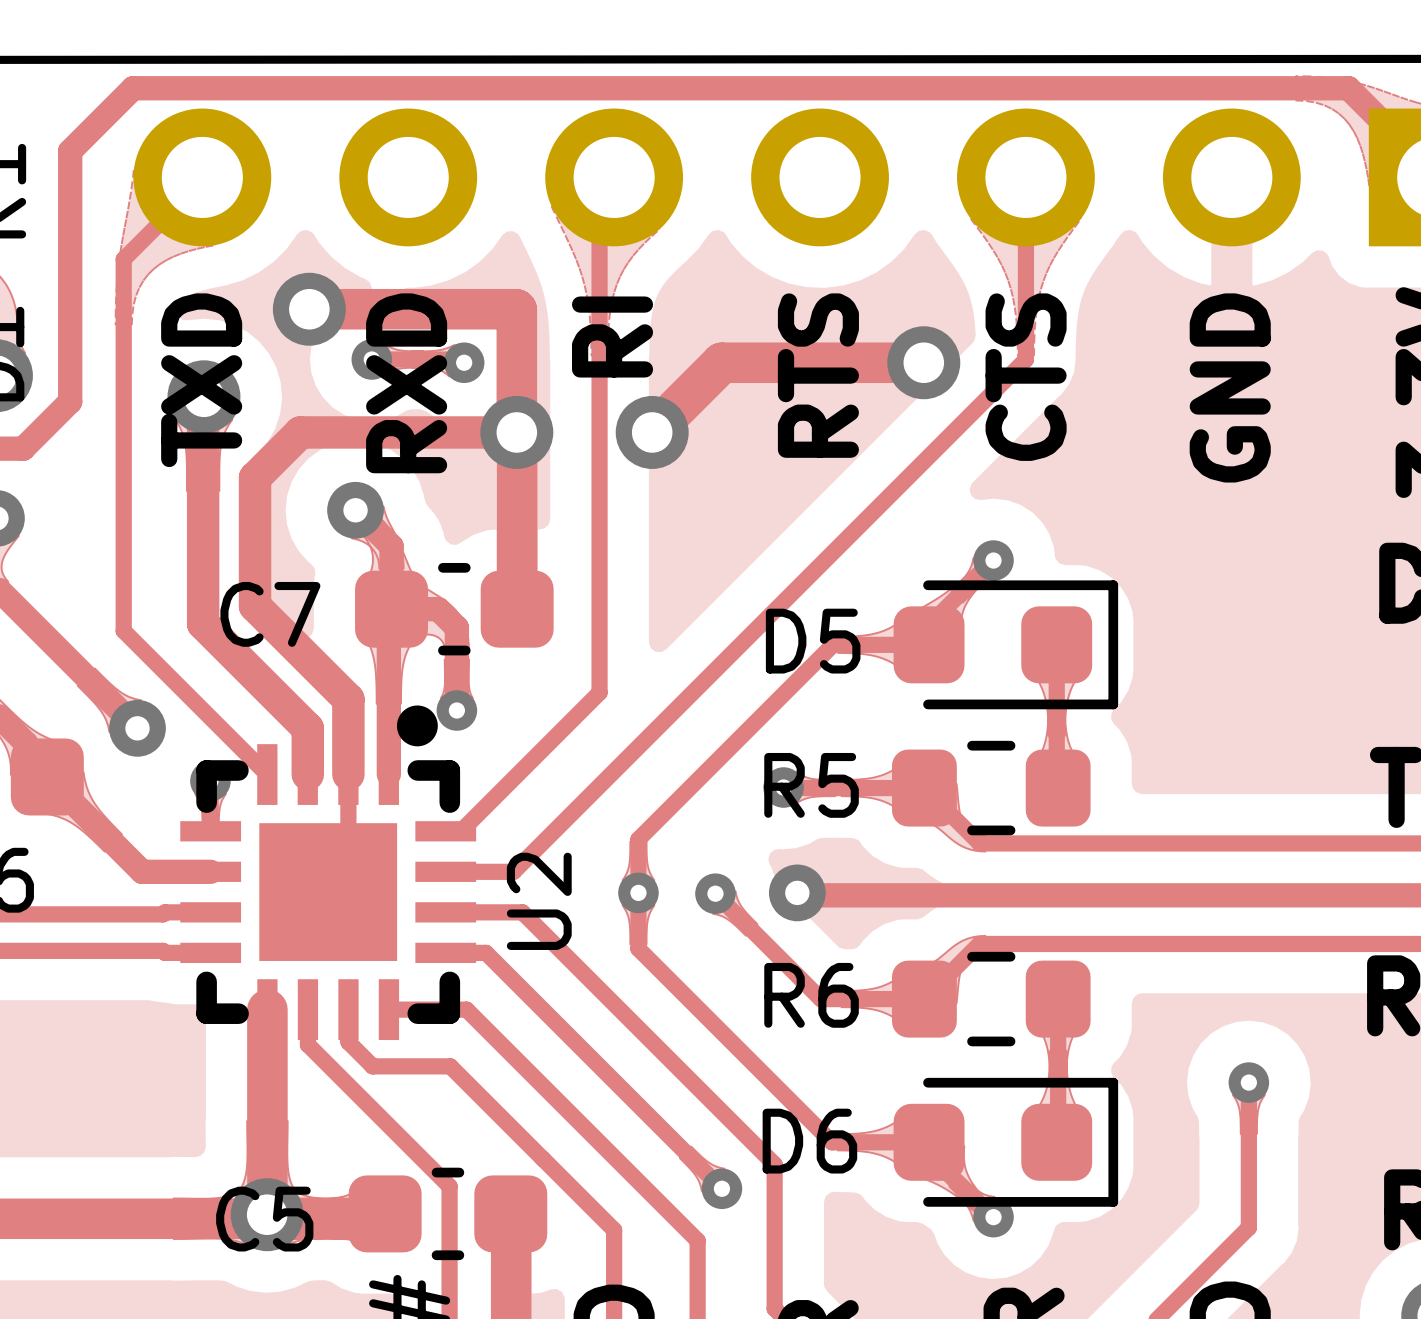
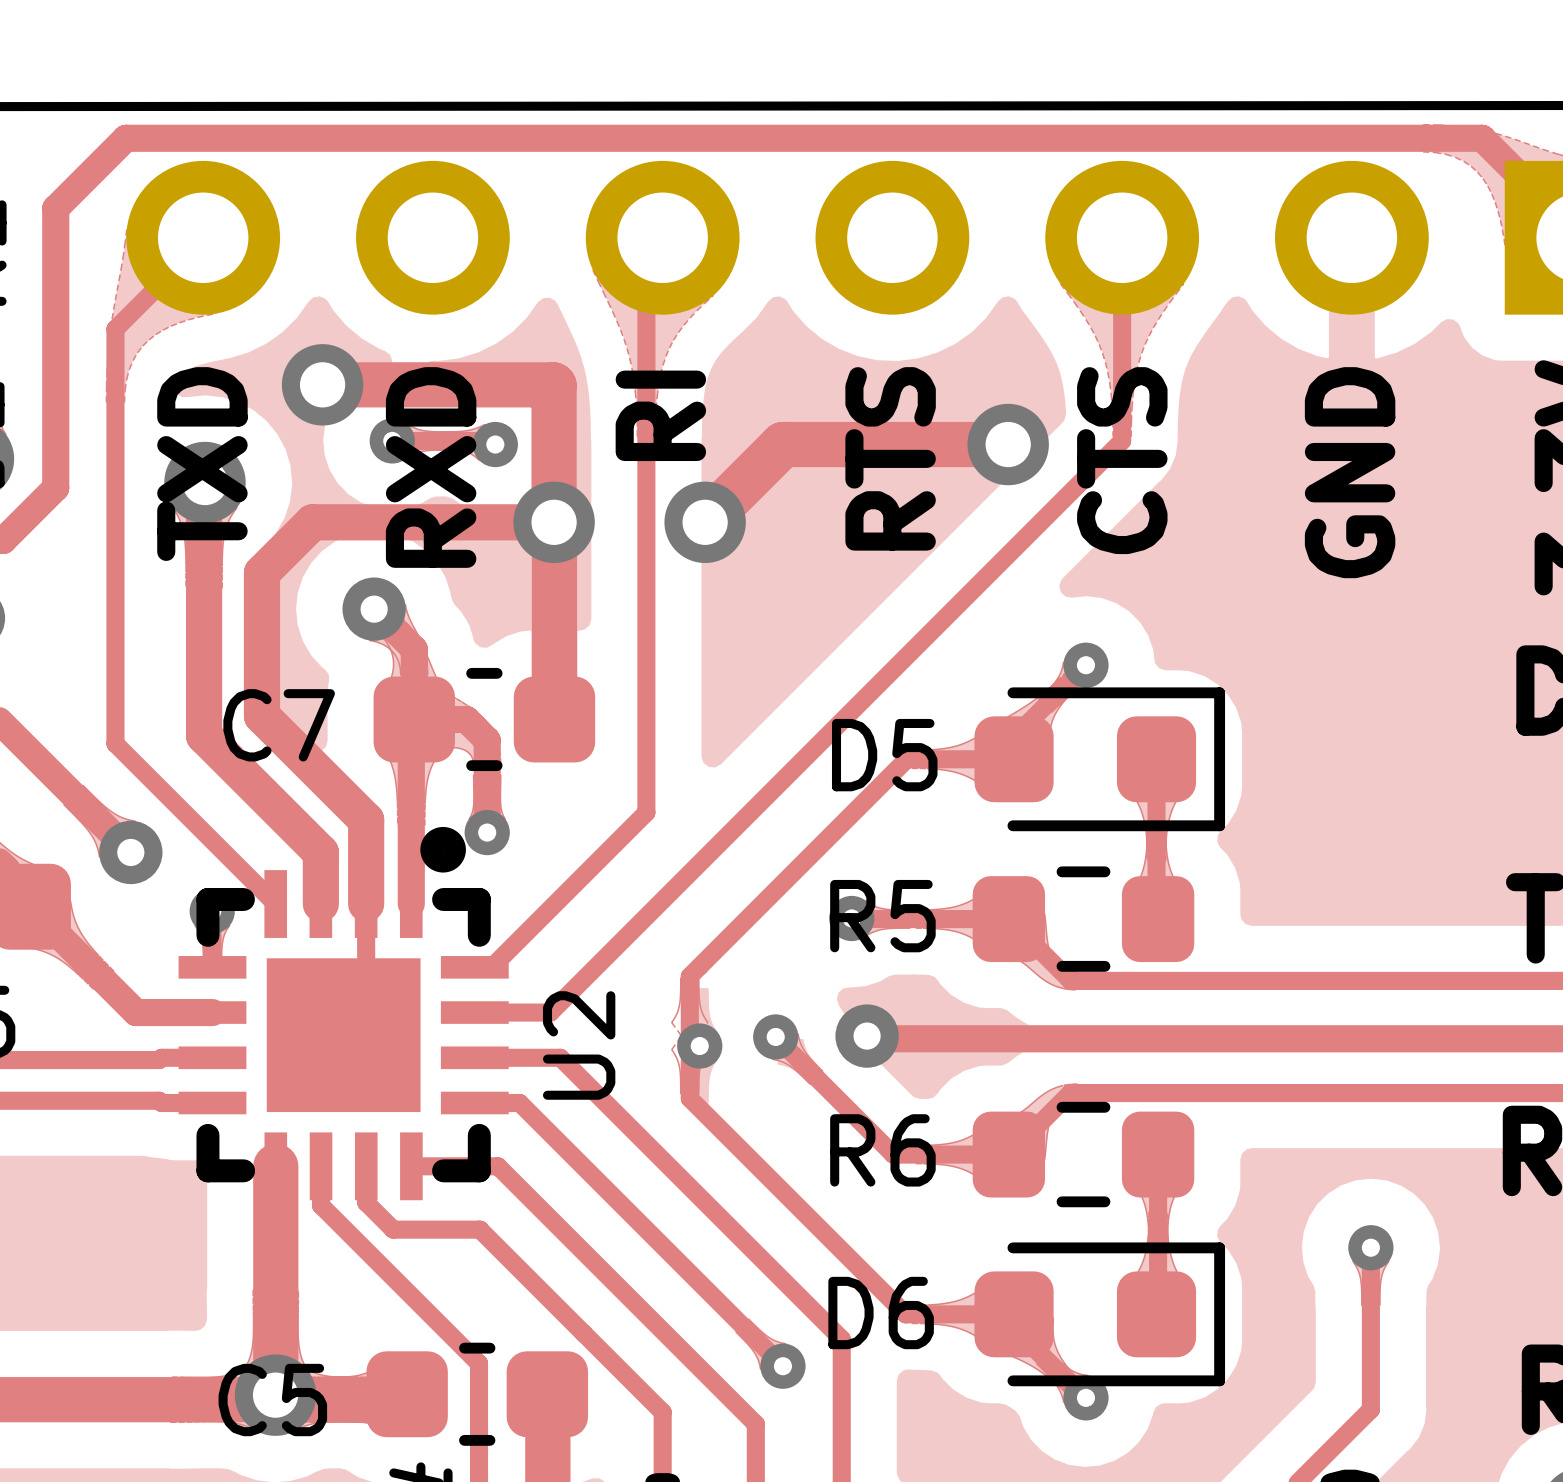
via position: (638, 892) -> (699, 1046)

